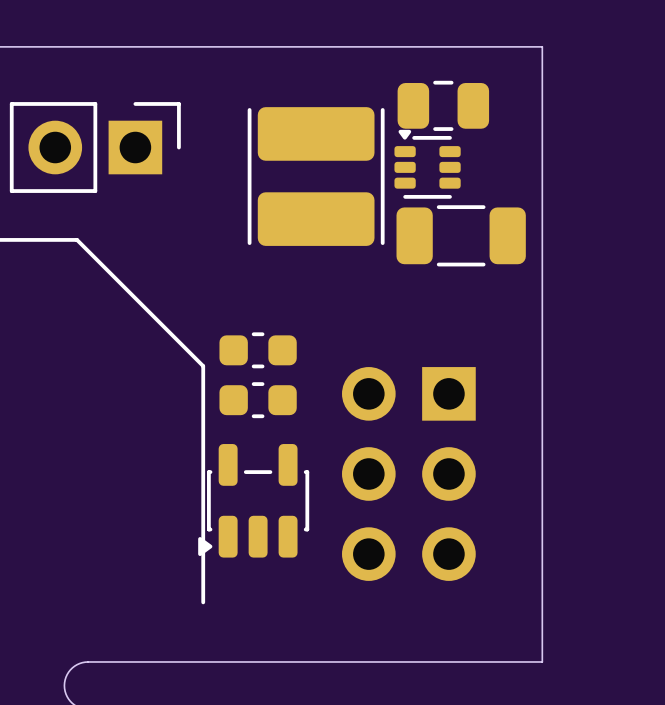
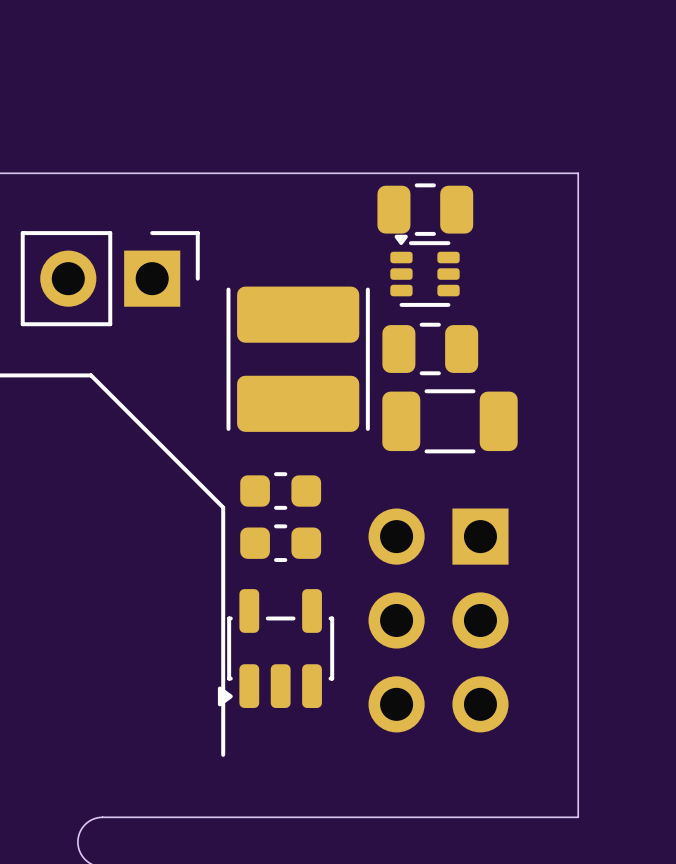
part position: (443, 105) -> (425, 209)
part position: (427, 164) -> (424, 270)
part position: (316, 176) -> (298, 359)
part: none -> (430, 349)
part position: (461, 235) -> (450, 421)

